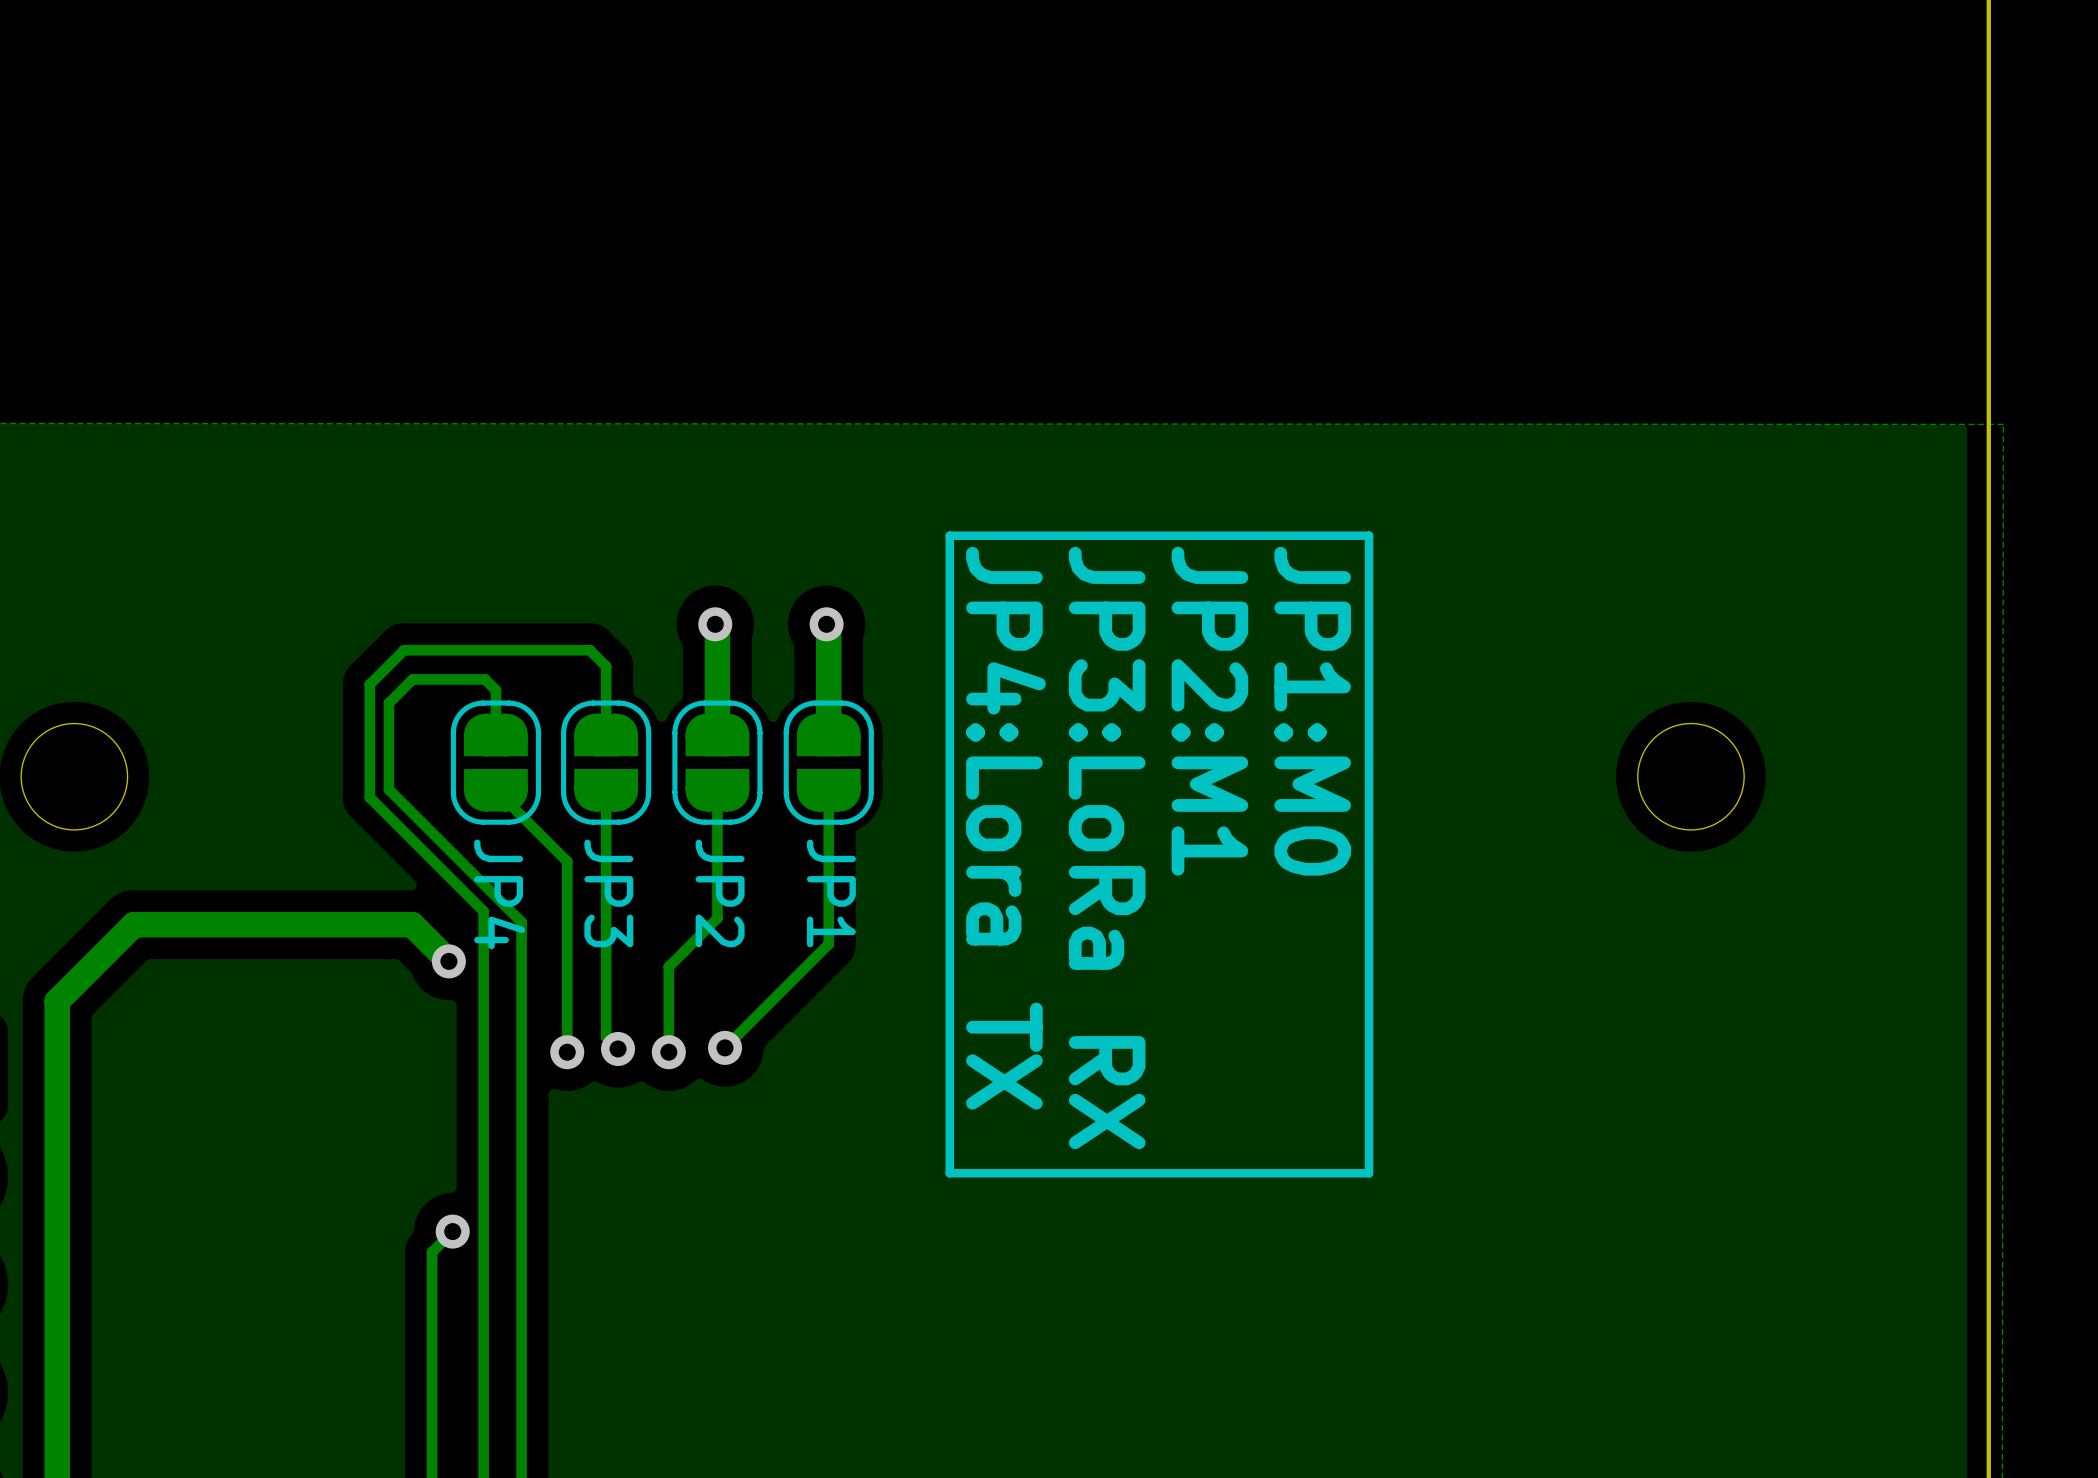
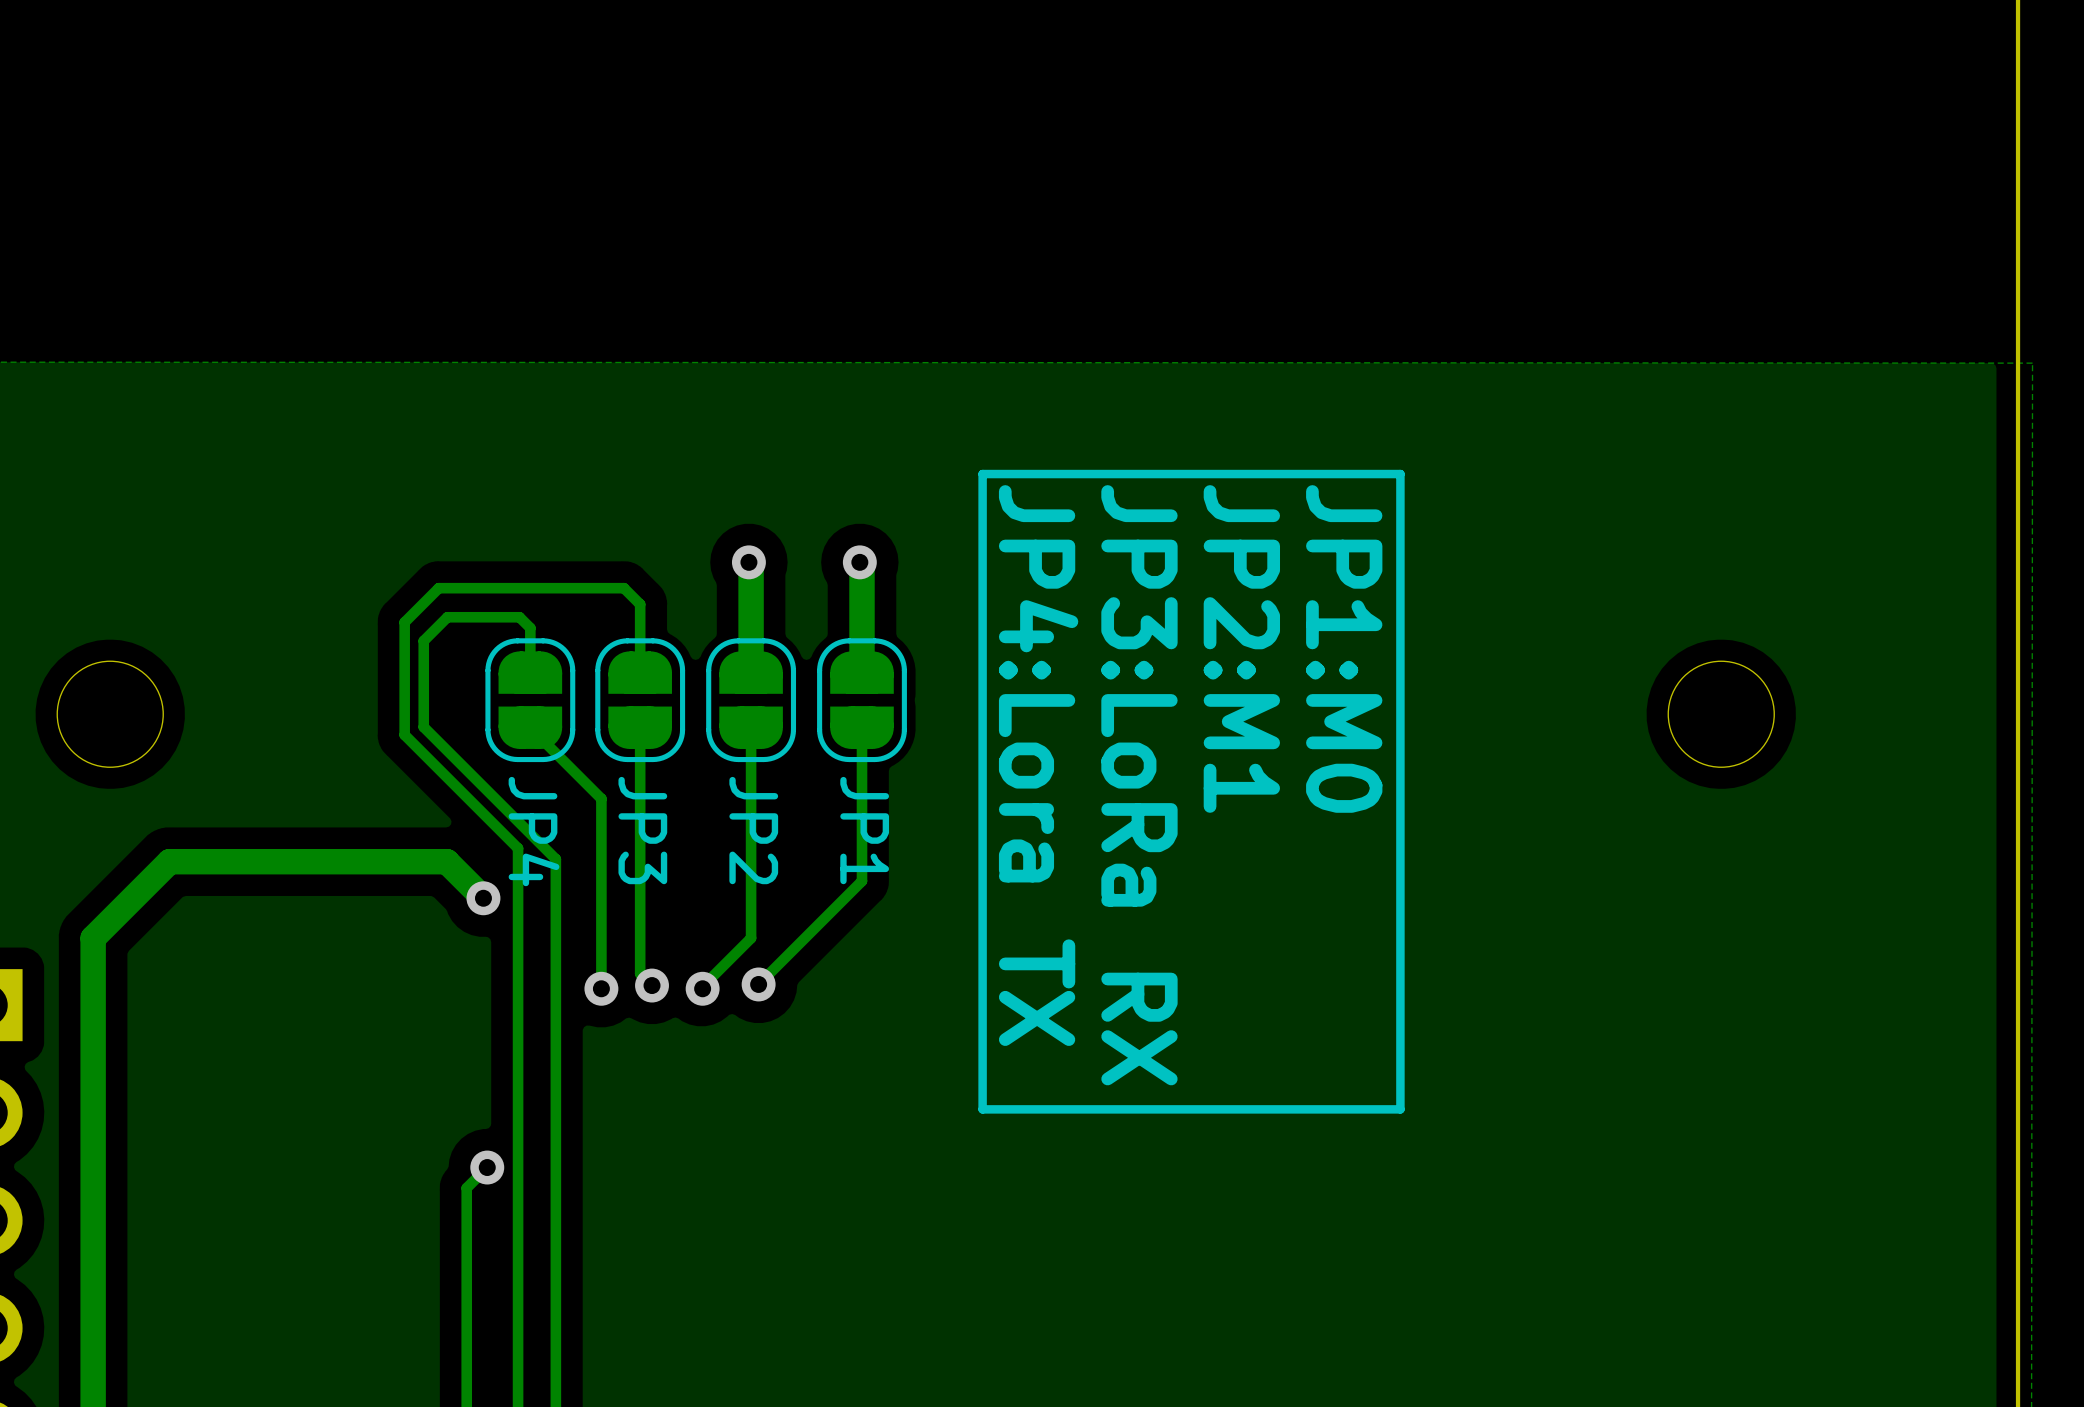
track: (717, 918) (668, 966) (668, 1052) -> (751, 855) (751, 938) (701, 987)

